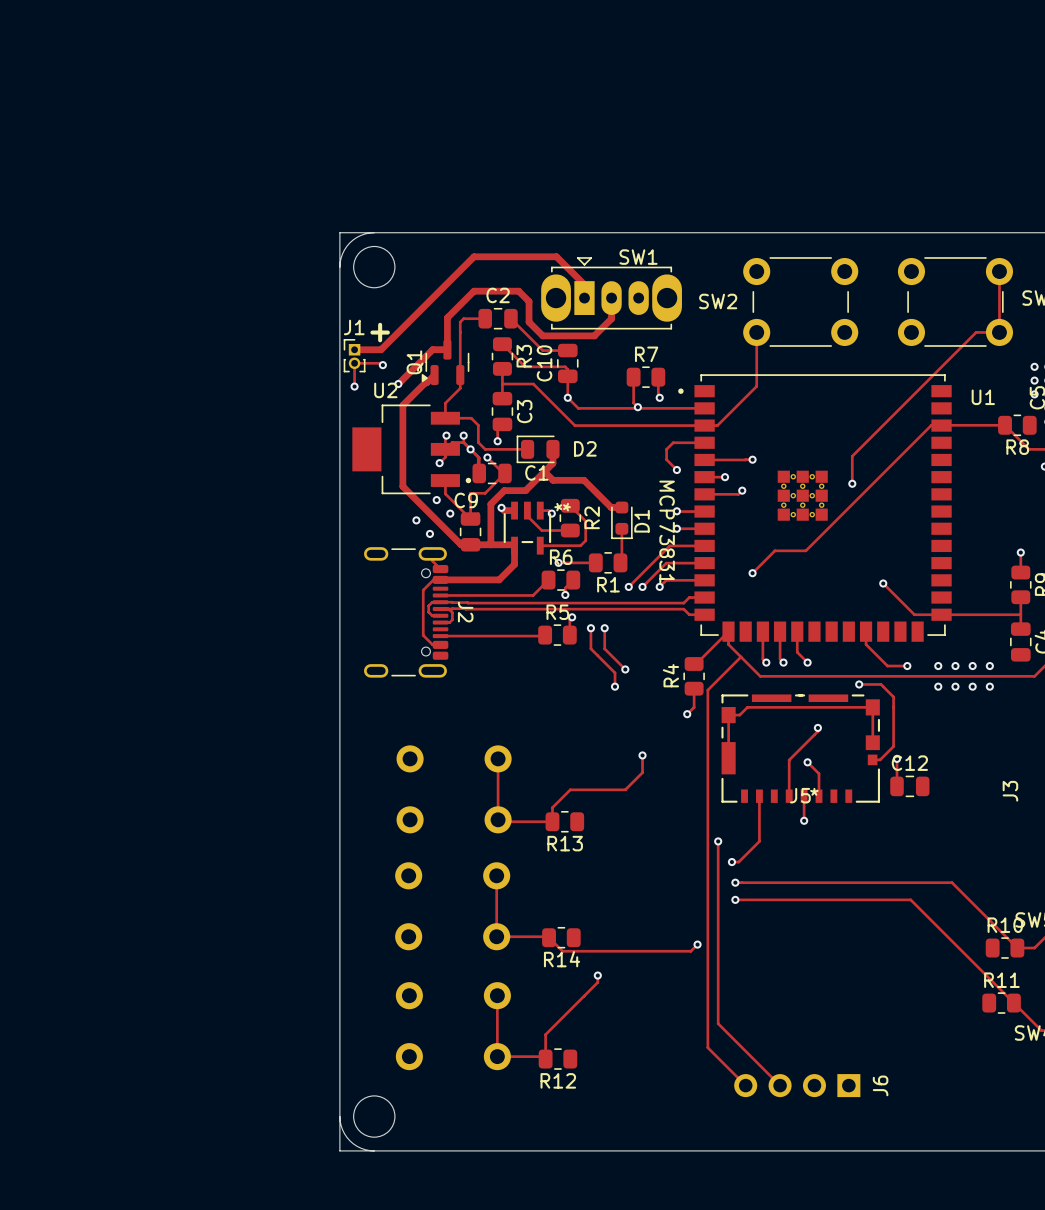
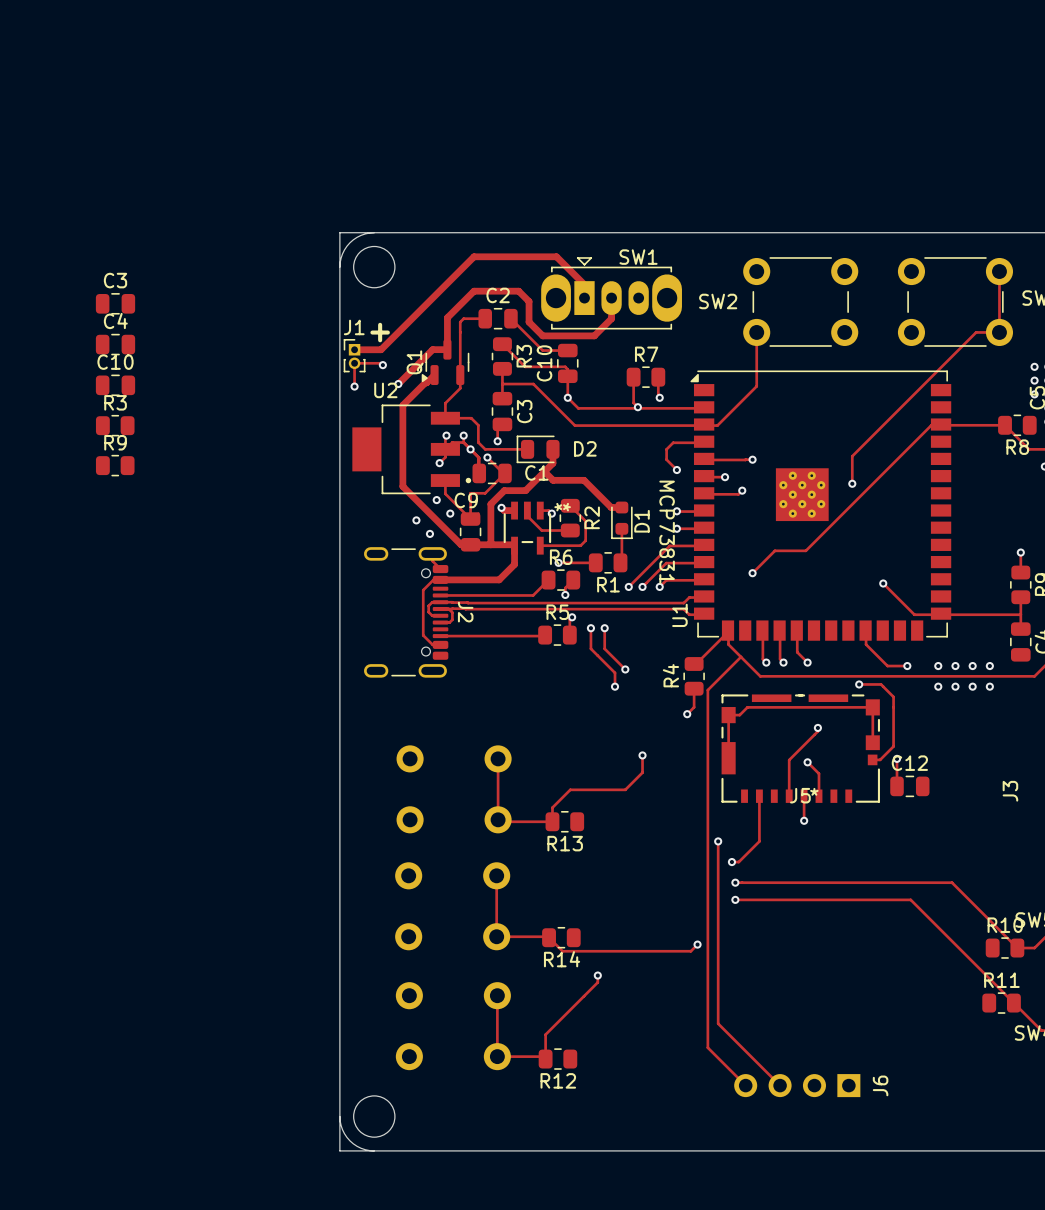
C3: none -> (115, 303)
C4: none -> (115, 344)
U1 footprint: [678, 374, 952, 642] -> [690, 370, 952, 641]
C10: none -> (115, 385)
U1 name position: U1 (983, 397) -> U1 (679, 615)
R3: none -> (115, 425)
R9: none -> (115, 465)

